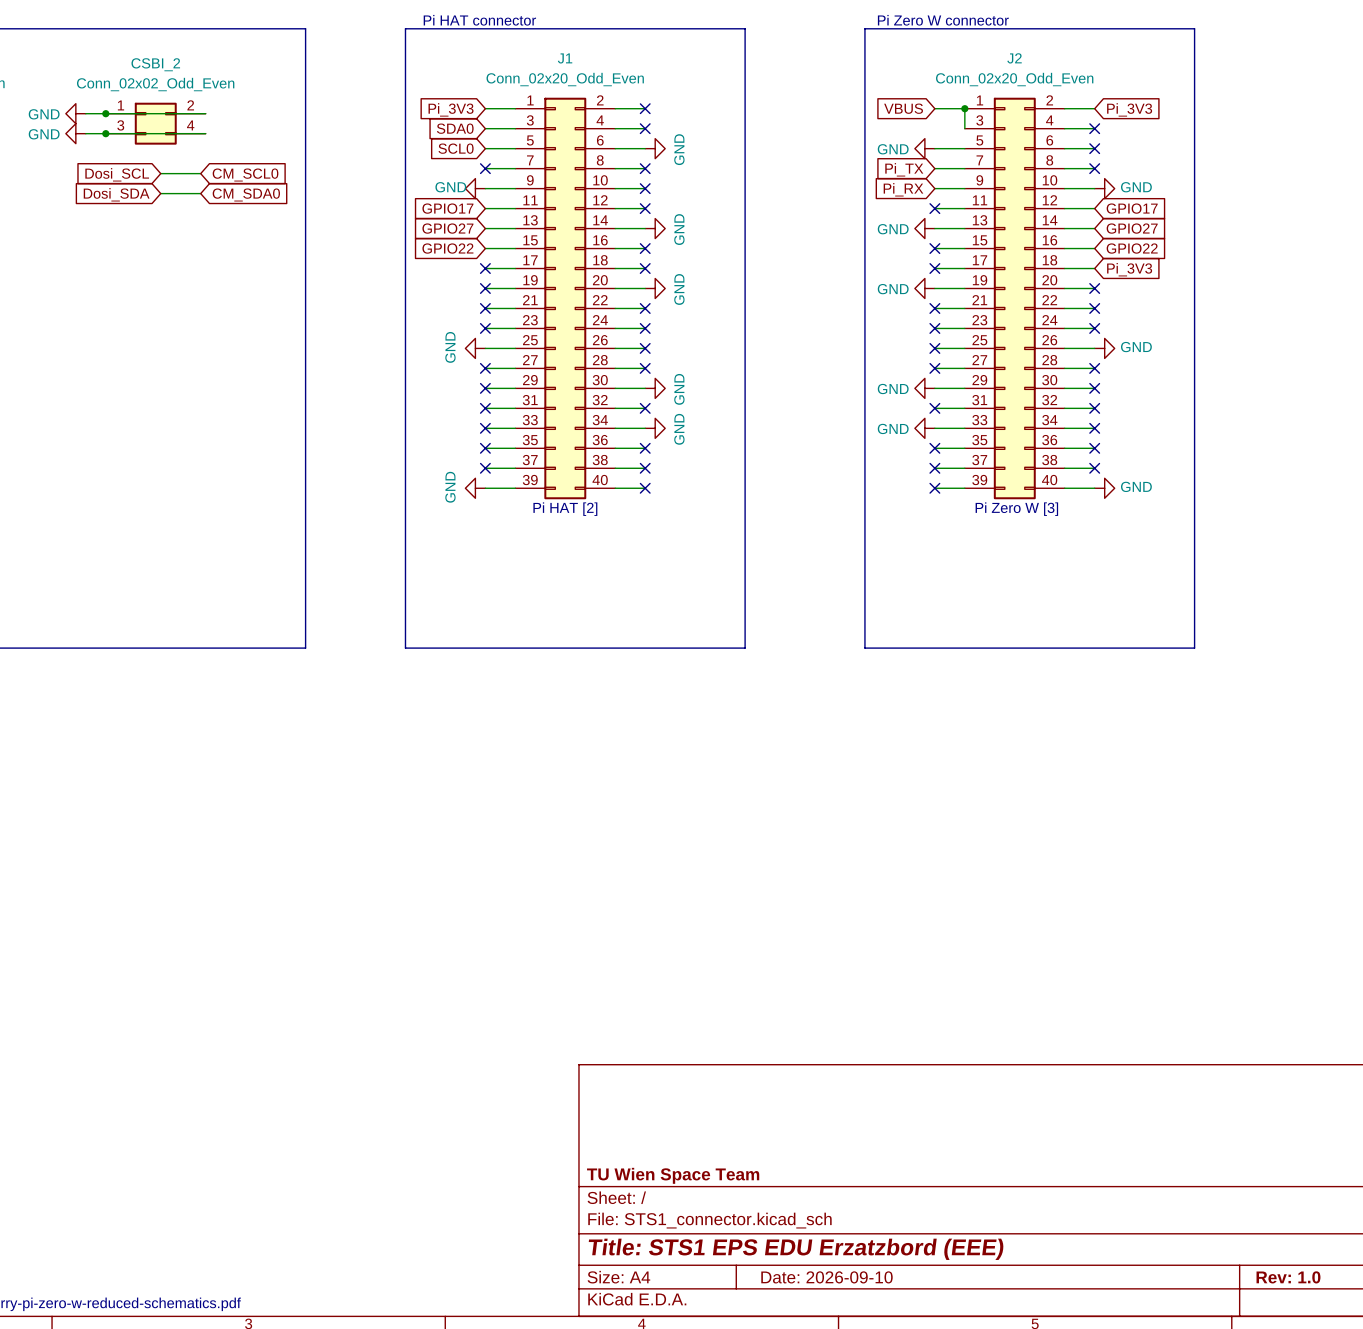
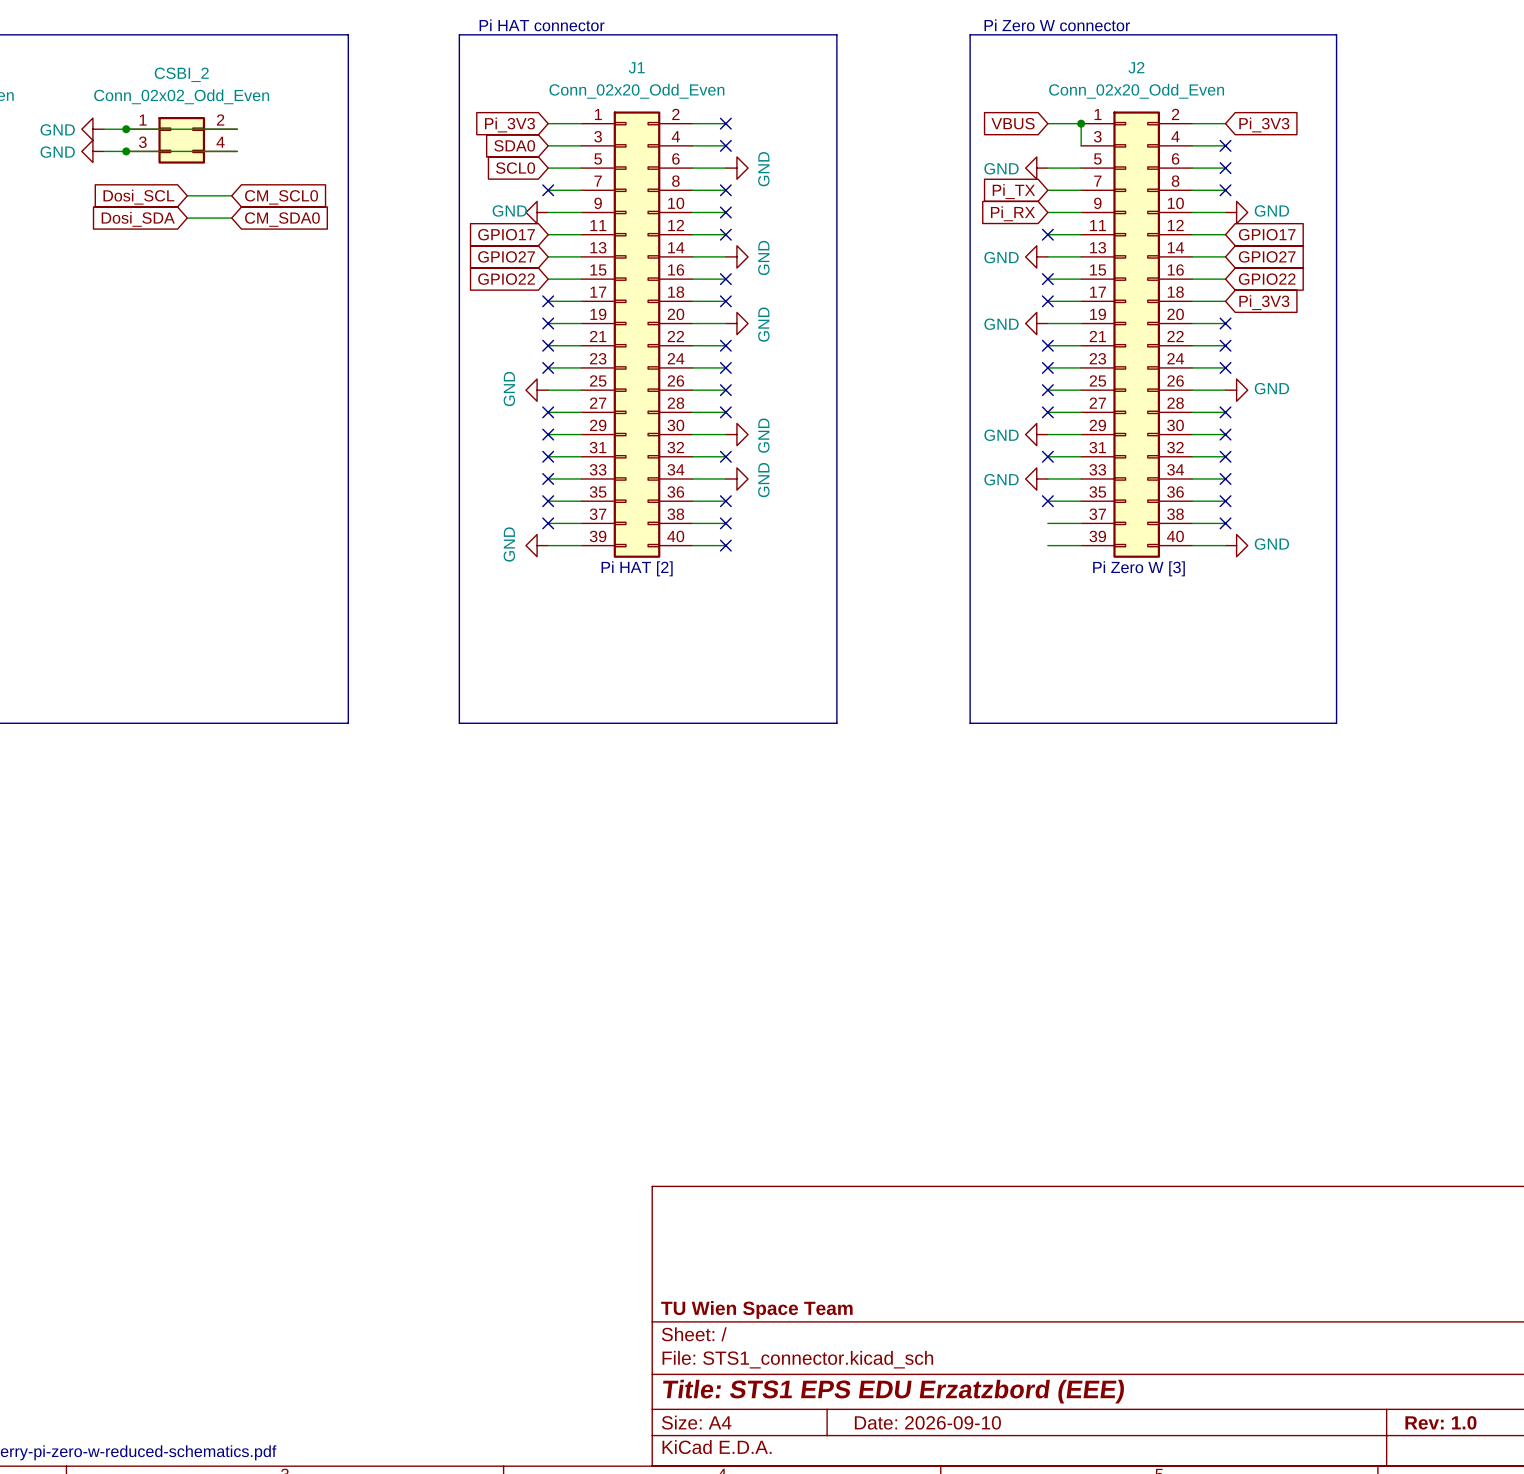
no-connect mark: (934, 468) -> none
no-connect mark: (934, 488) -> none

